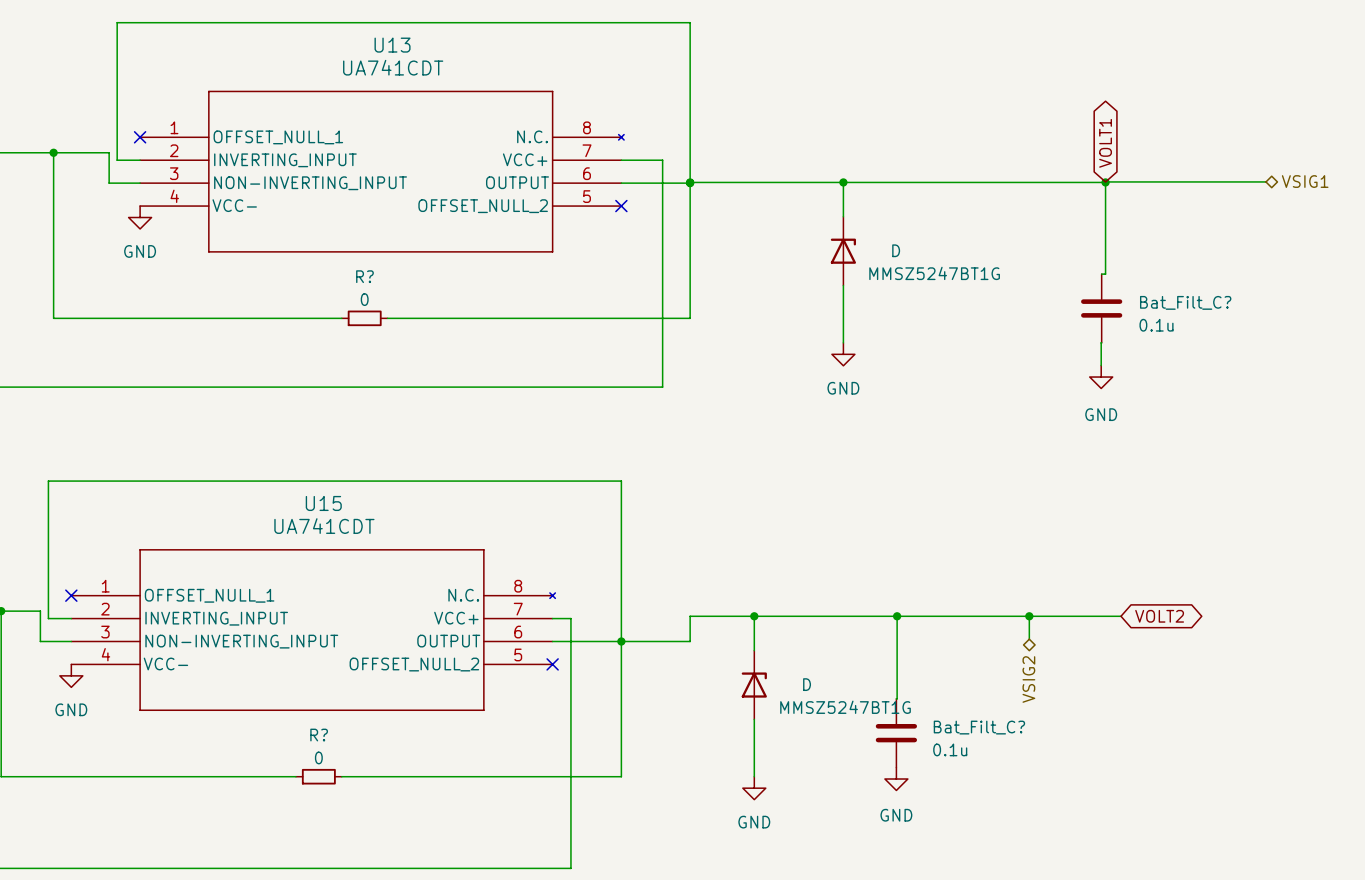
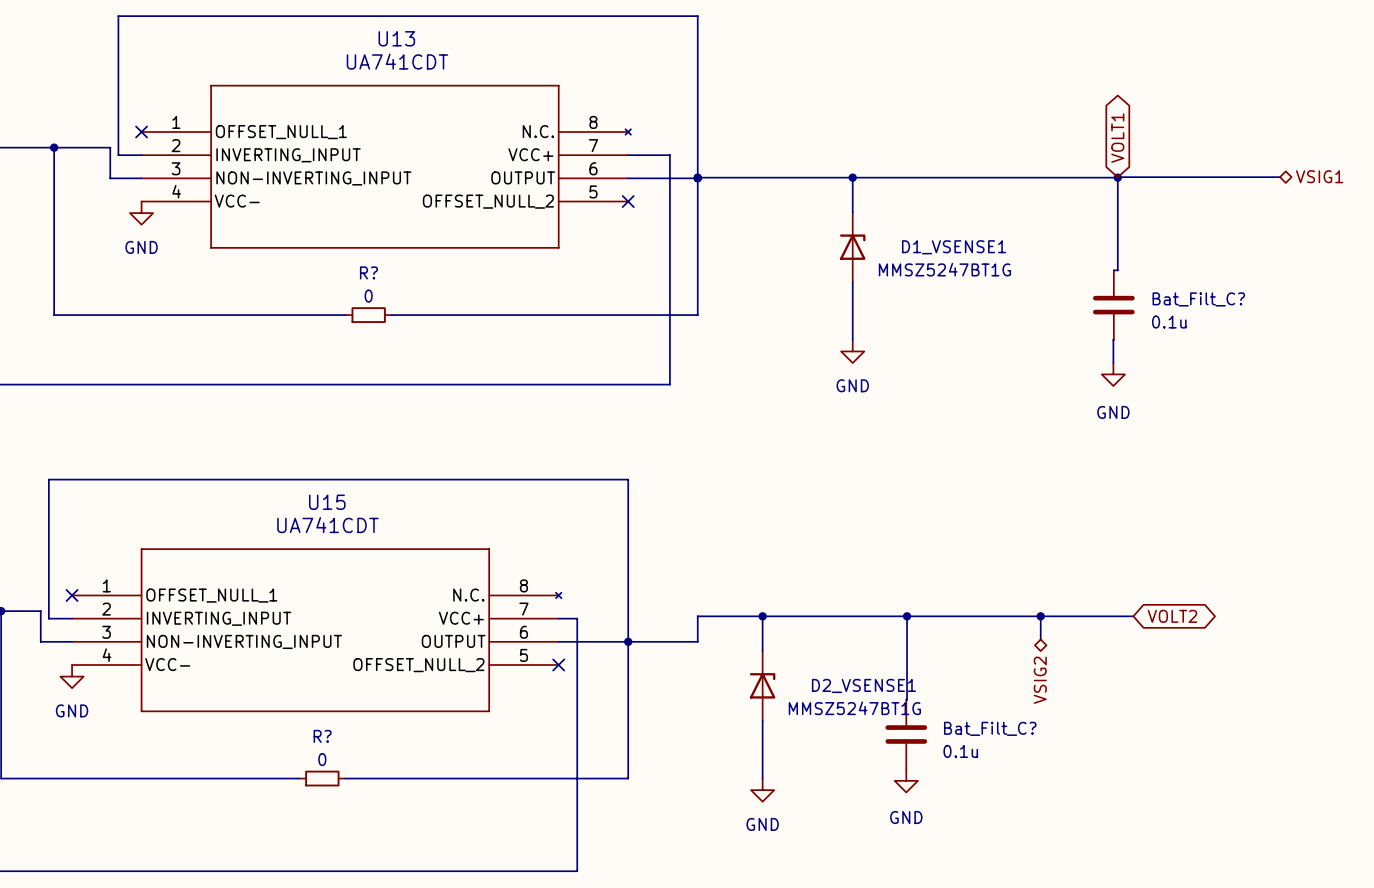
D name: D (896, 250) -> D1_VSENSE1 (954, 247)
D name: D (807, 684) -> D2_VSENSE1 (863, 685)

